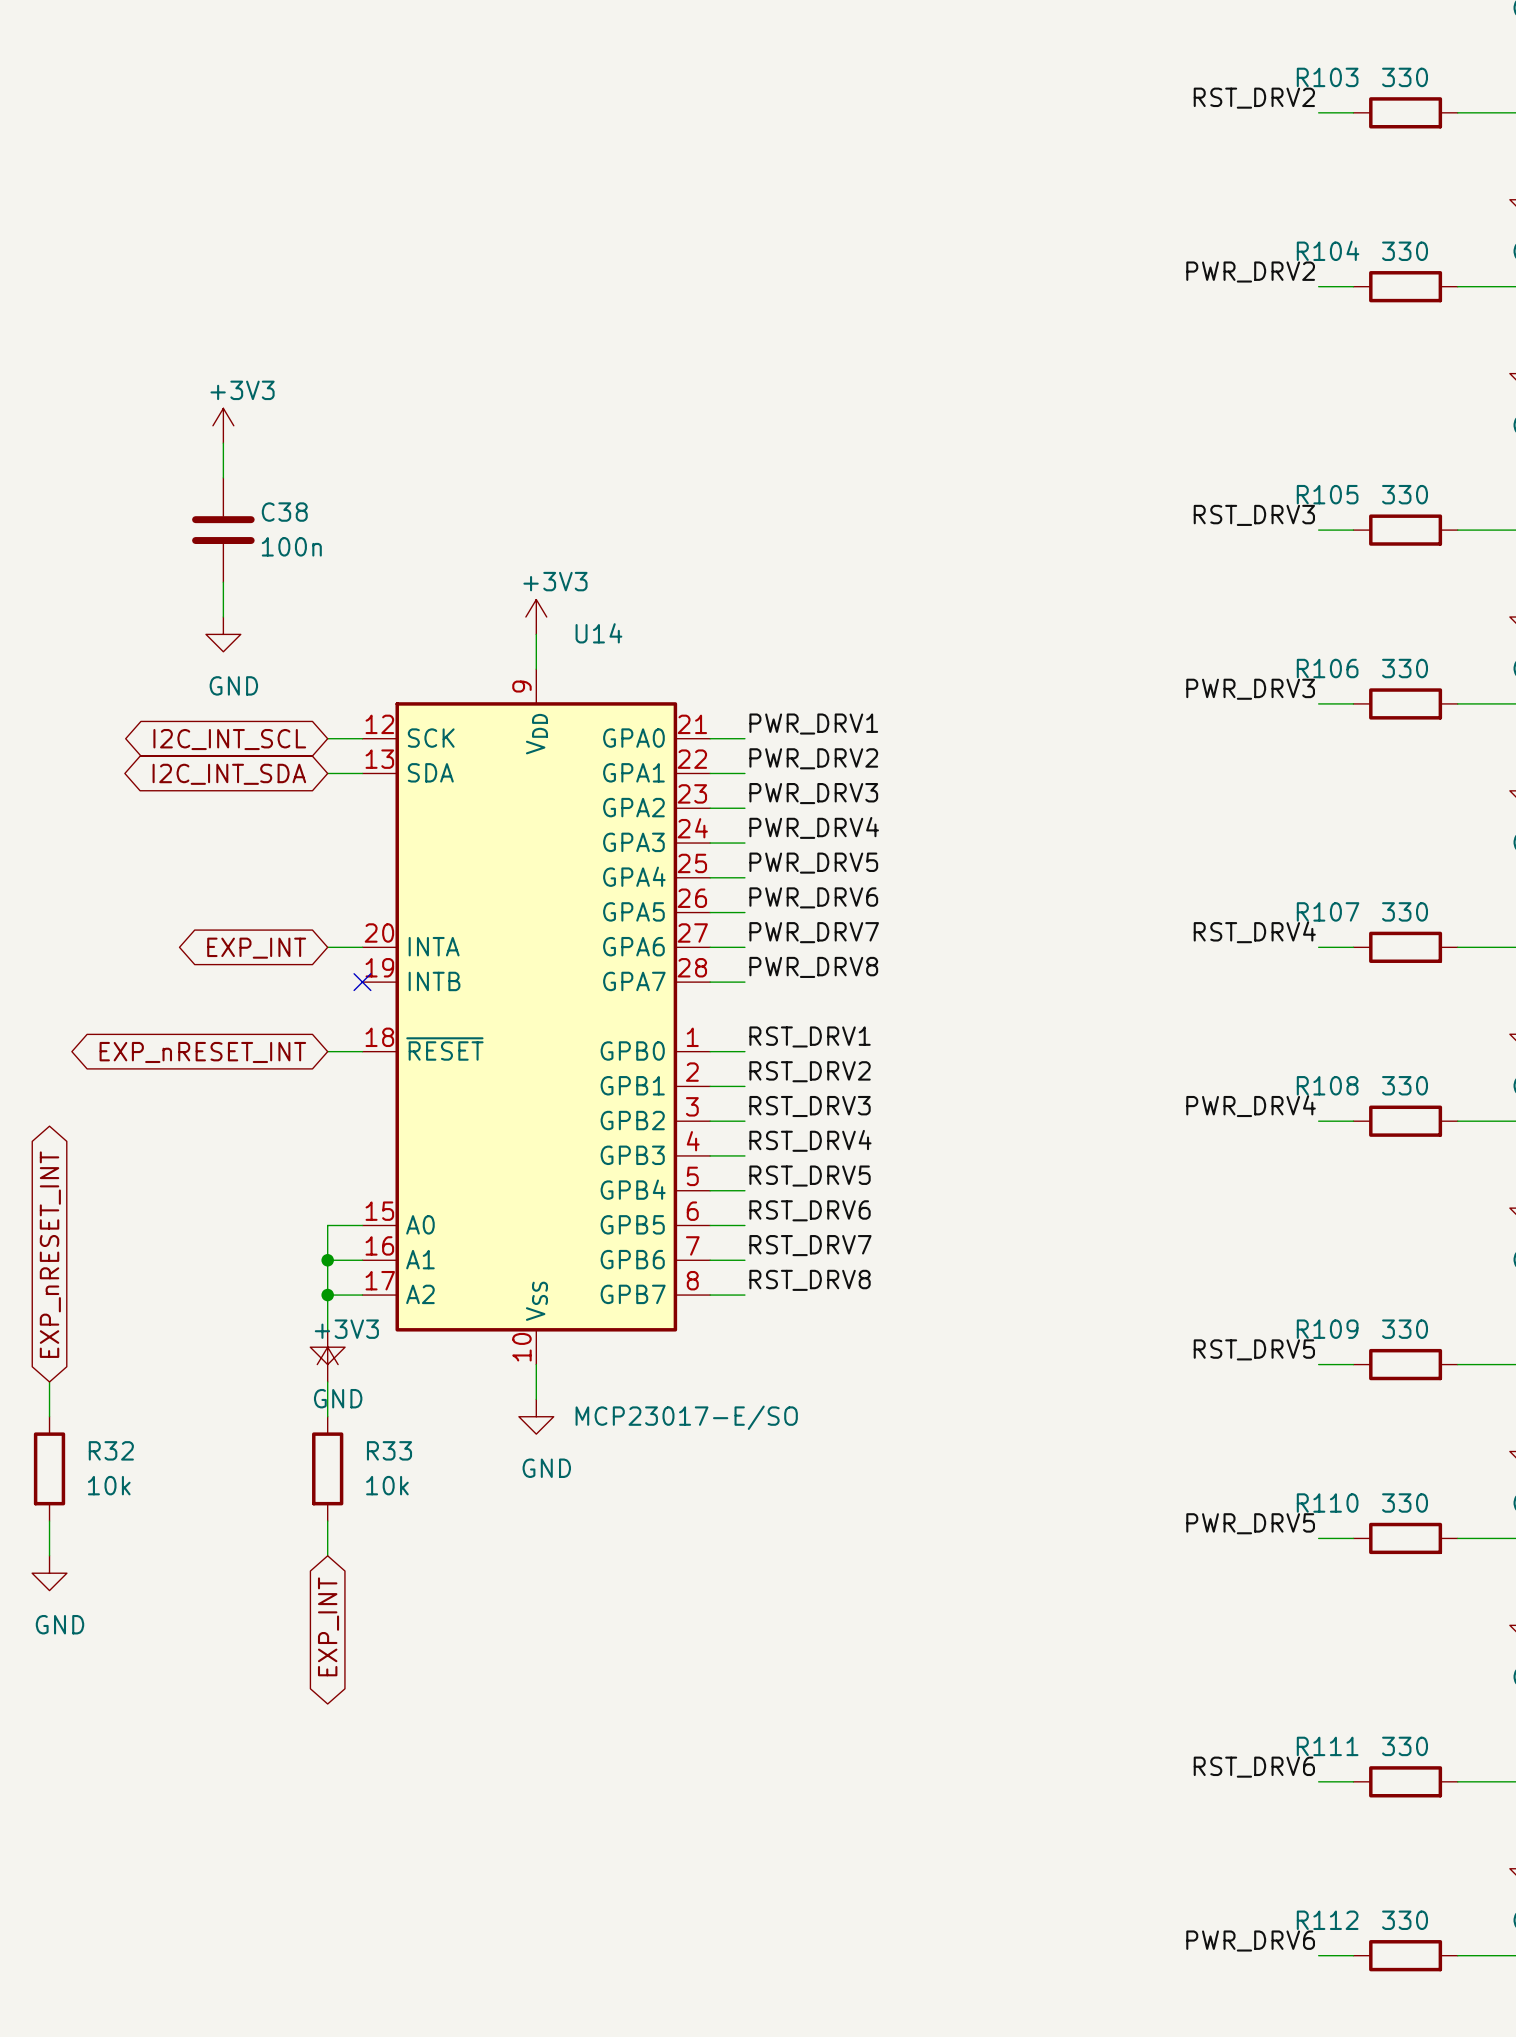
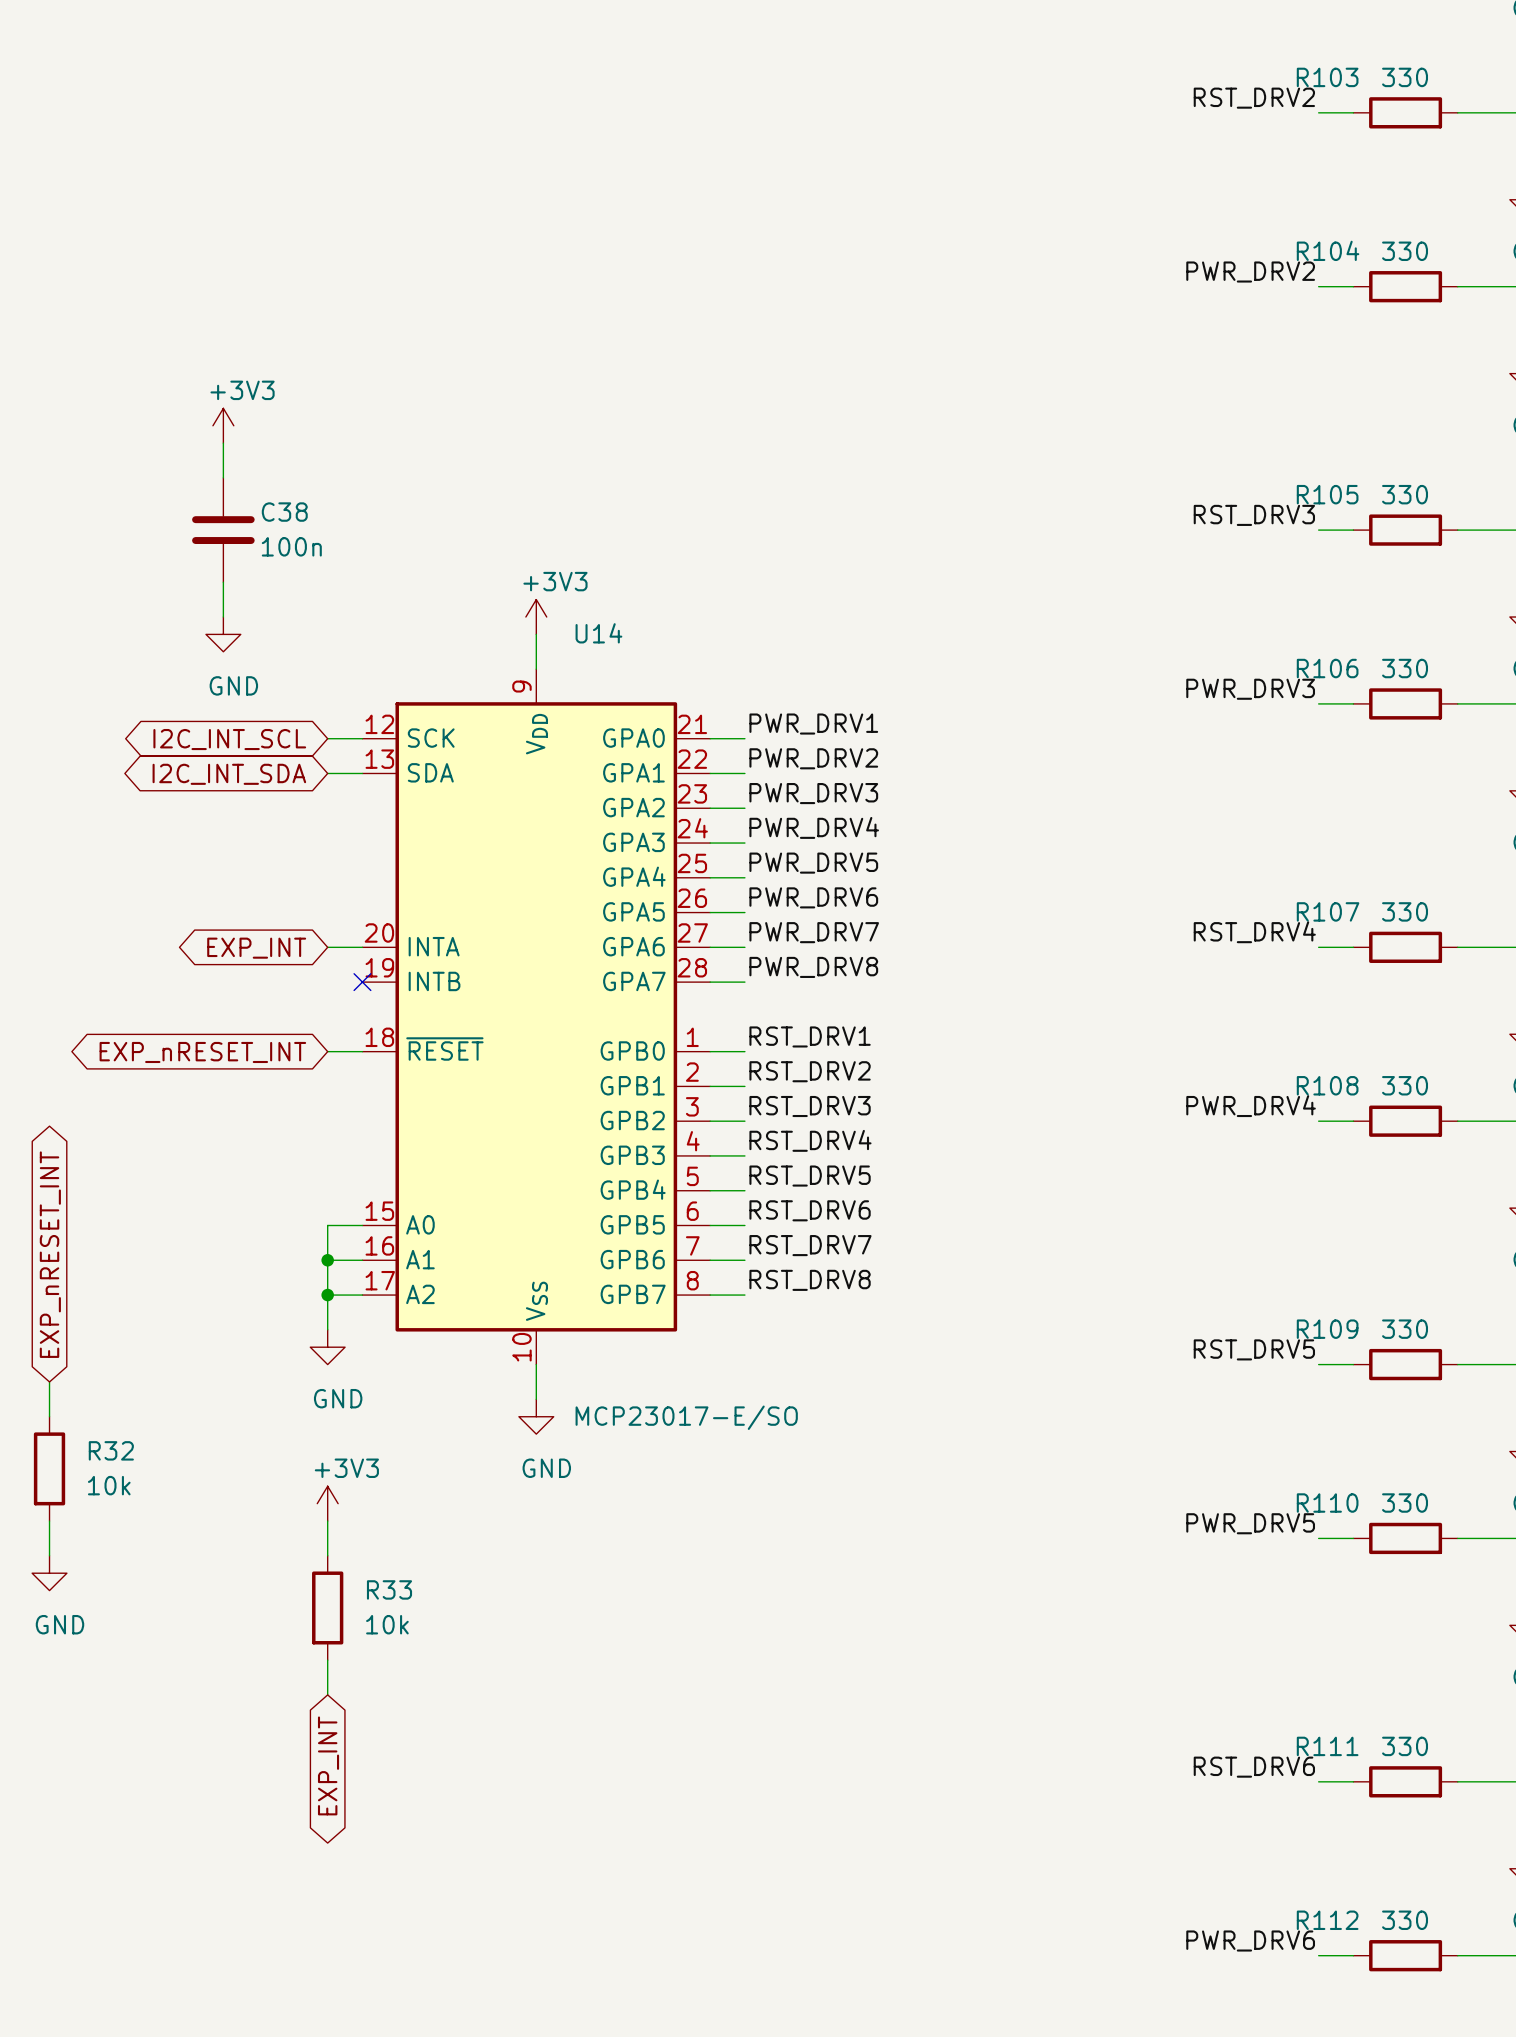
power symbol position: +3V3 (327, 1364) -> +3V3 (327, 1503)
wire: (327, 1381) (327, 1416) -> (327, 1660) (327, 1694)
R33 position: (327, 1468) -> (327, 1607)
global label position: EXP_INT (328, 1626) -> EXP_INT (328, 1765)

